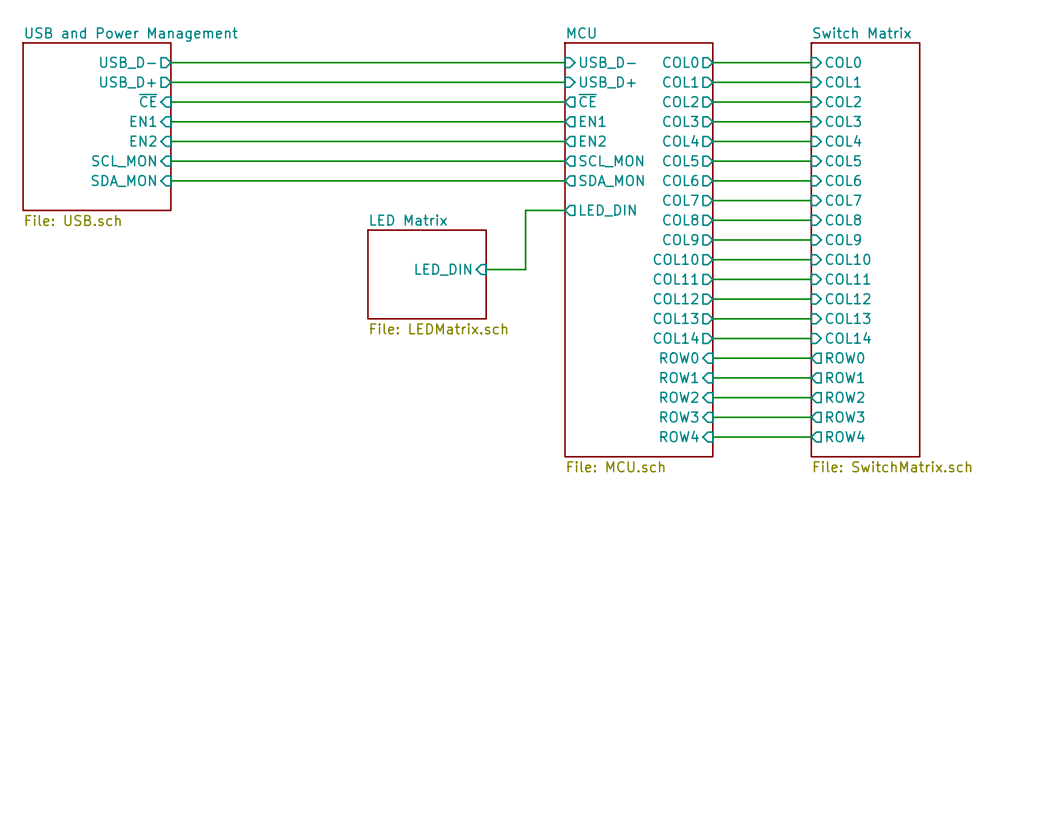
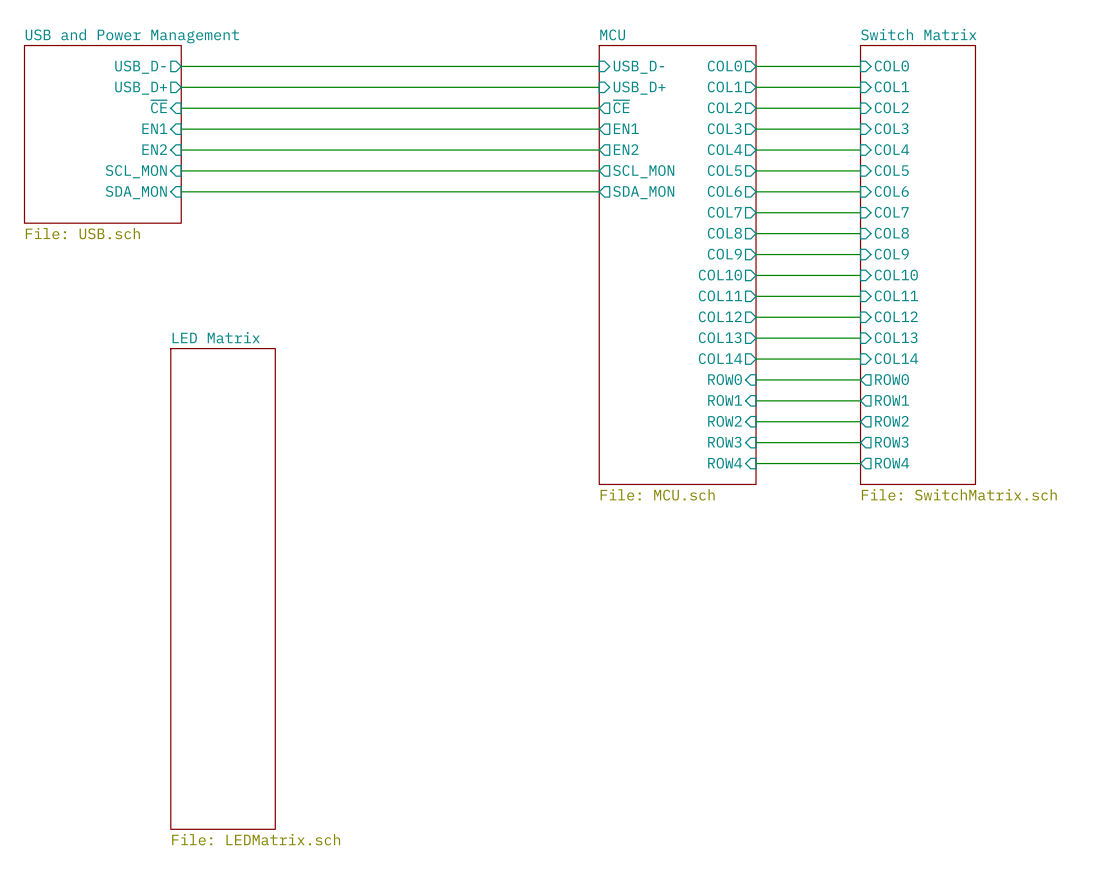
wire: (565, 210) (525, 210) (525, 269) (486, 269) -> none
sheet pin: LED_DIN (607, 210) -> none
sheet pin: LED_DIN (443, 269) -> none
sheet LED Matrix: File: LEDMatrix.sch (427, 274) -> none
sheet LED Matrix: none -> File: LEDMatrix.sch (223, 588)

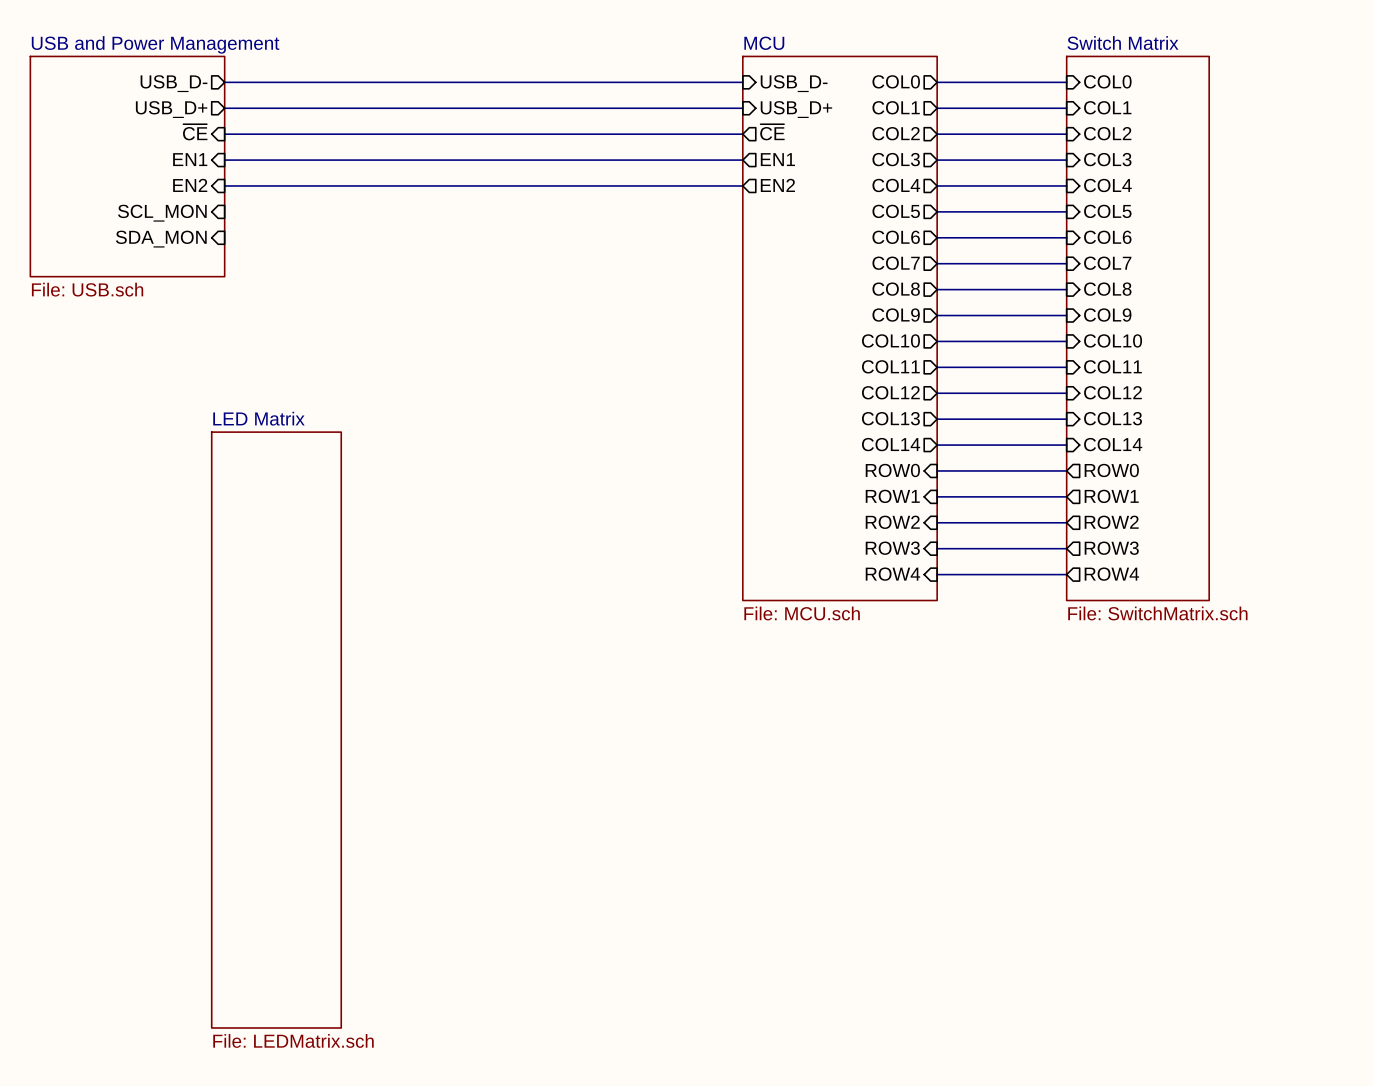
wire: (181, 170) (599, 170) -> none
sheet pin: SCL_MON (643, 171) -> none
wire: (181, 191) (599, 191) -> none
sheet pin: SDA_MON (643, 192) -> none

